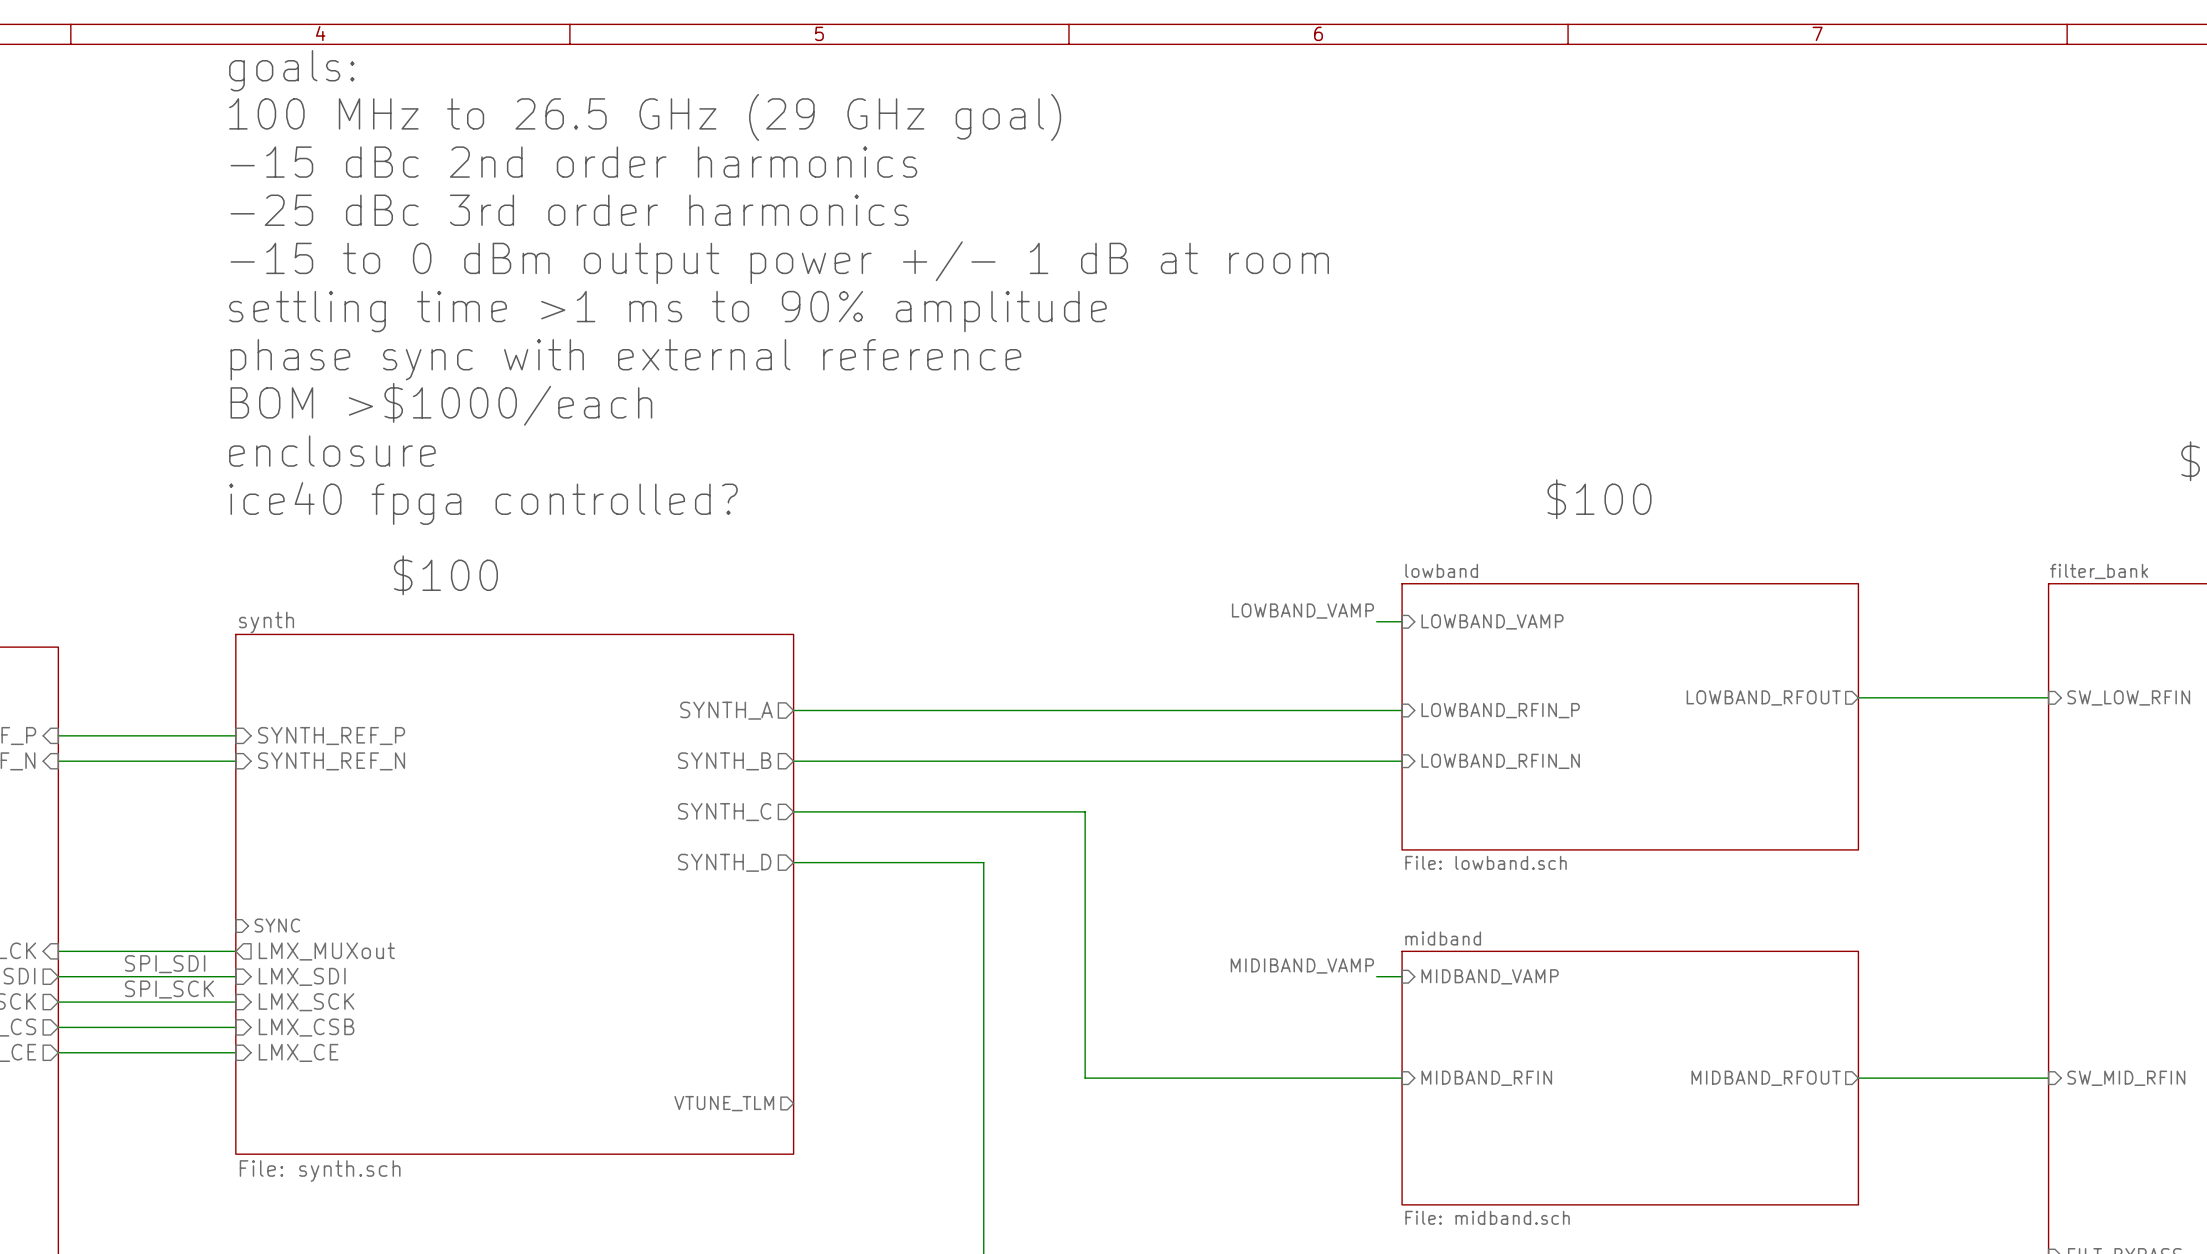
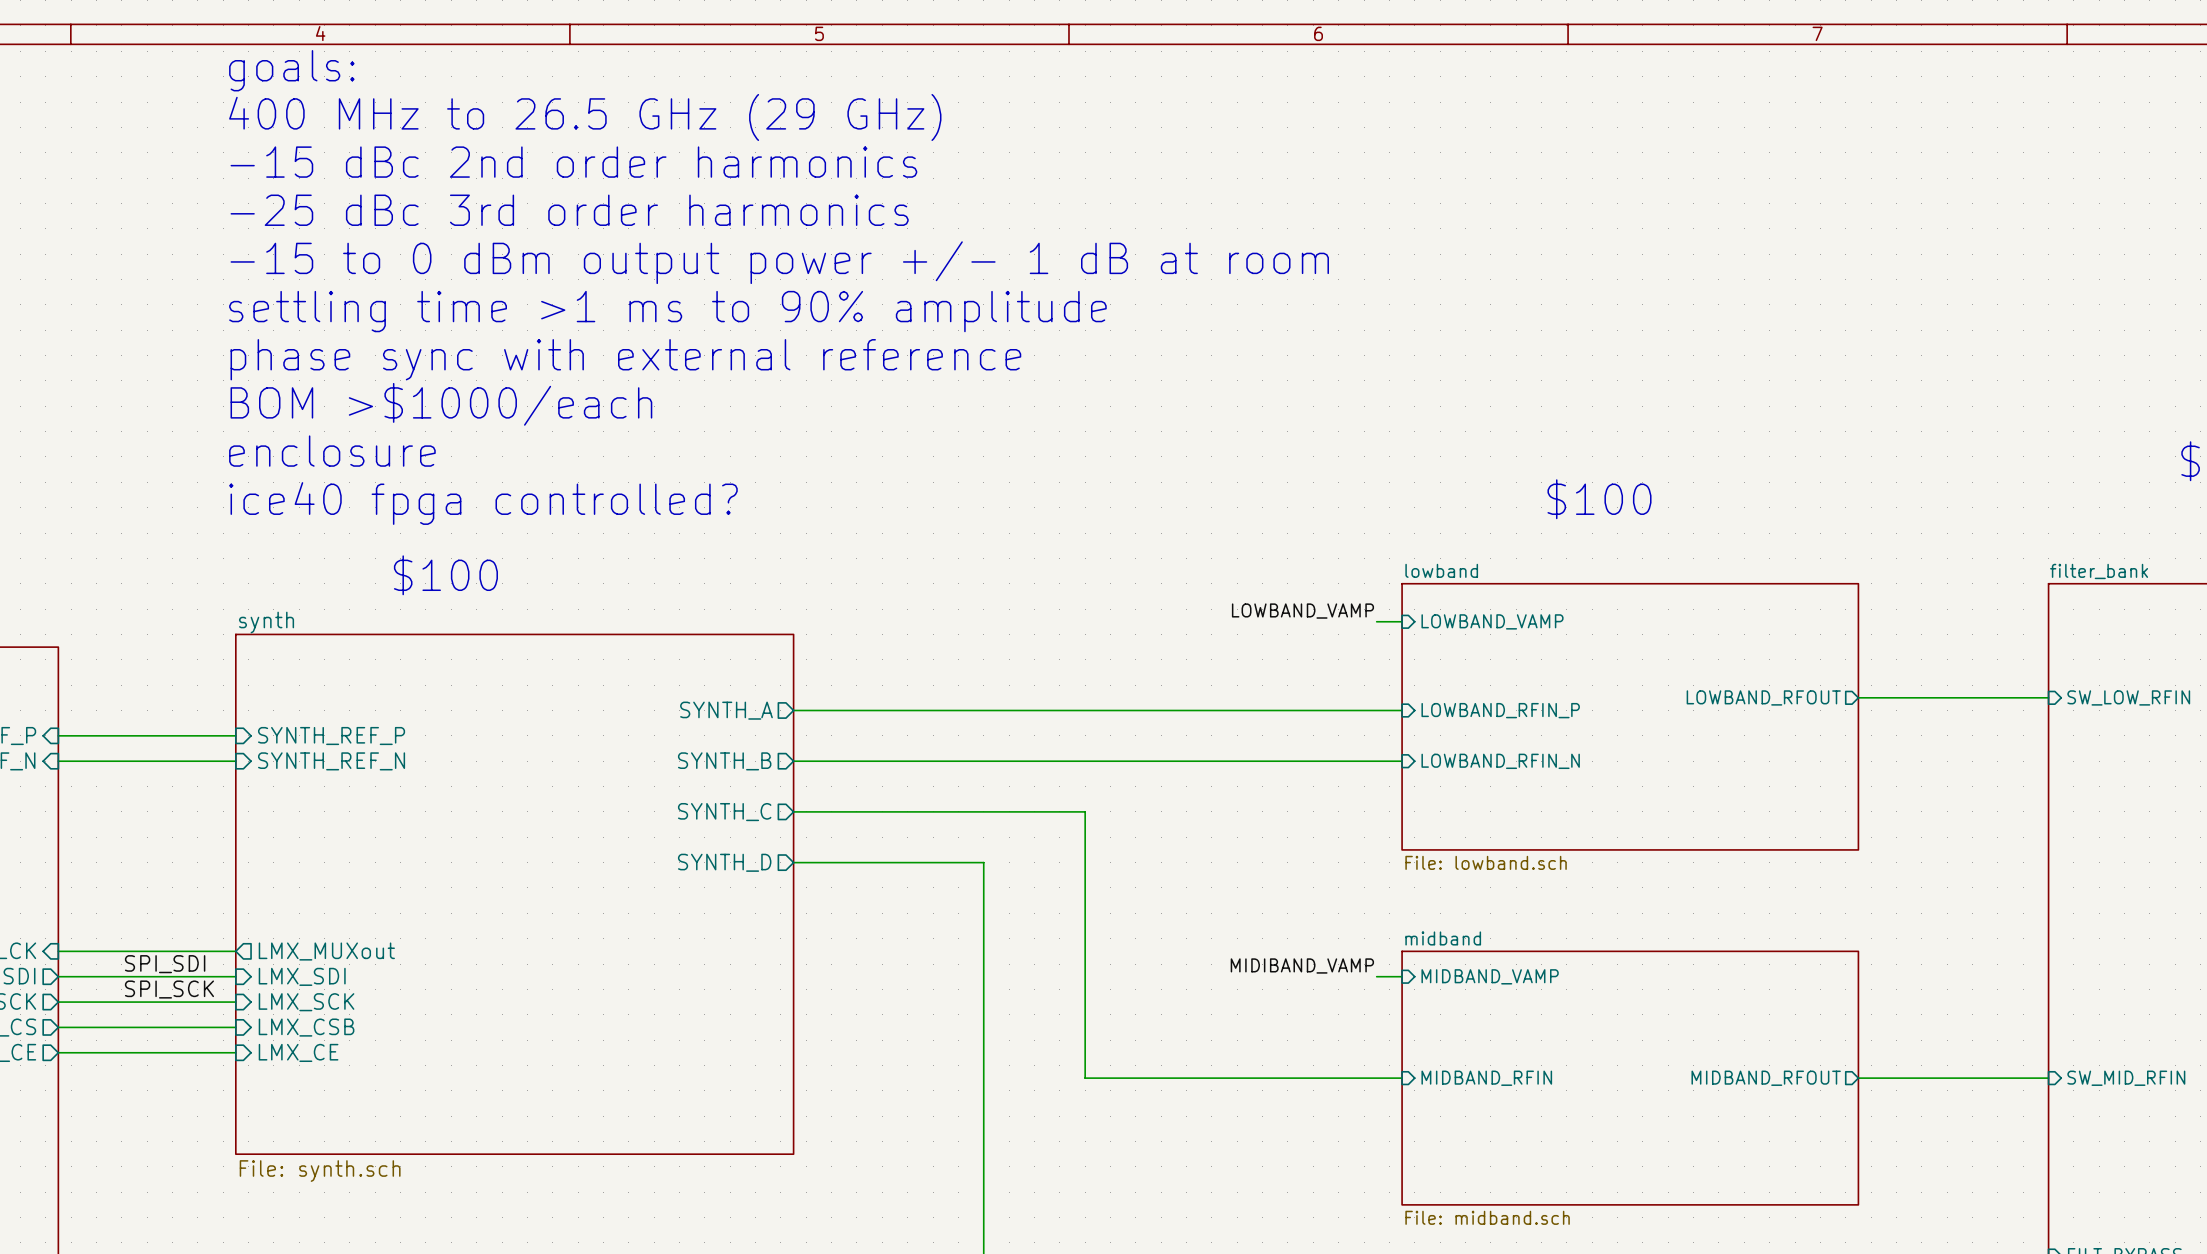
text: 100 MHz to 26.5 GHz (29 GHz goal) (645, 117) -> 400 MHz to 26.5 GHz (29 GHz) (585, 117)
sheet pin: SYNC (277, 925) -> none
sheet pin: VTUNE_TLM (724, 1103) -> none

